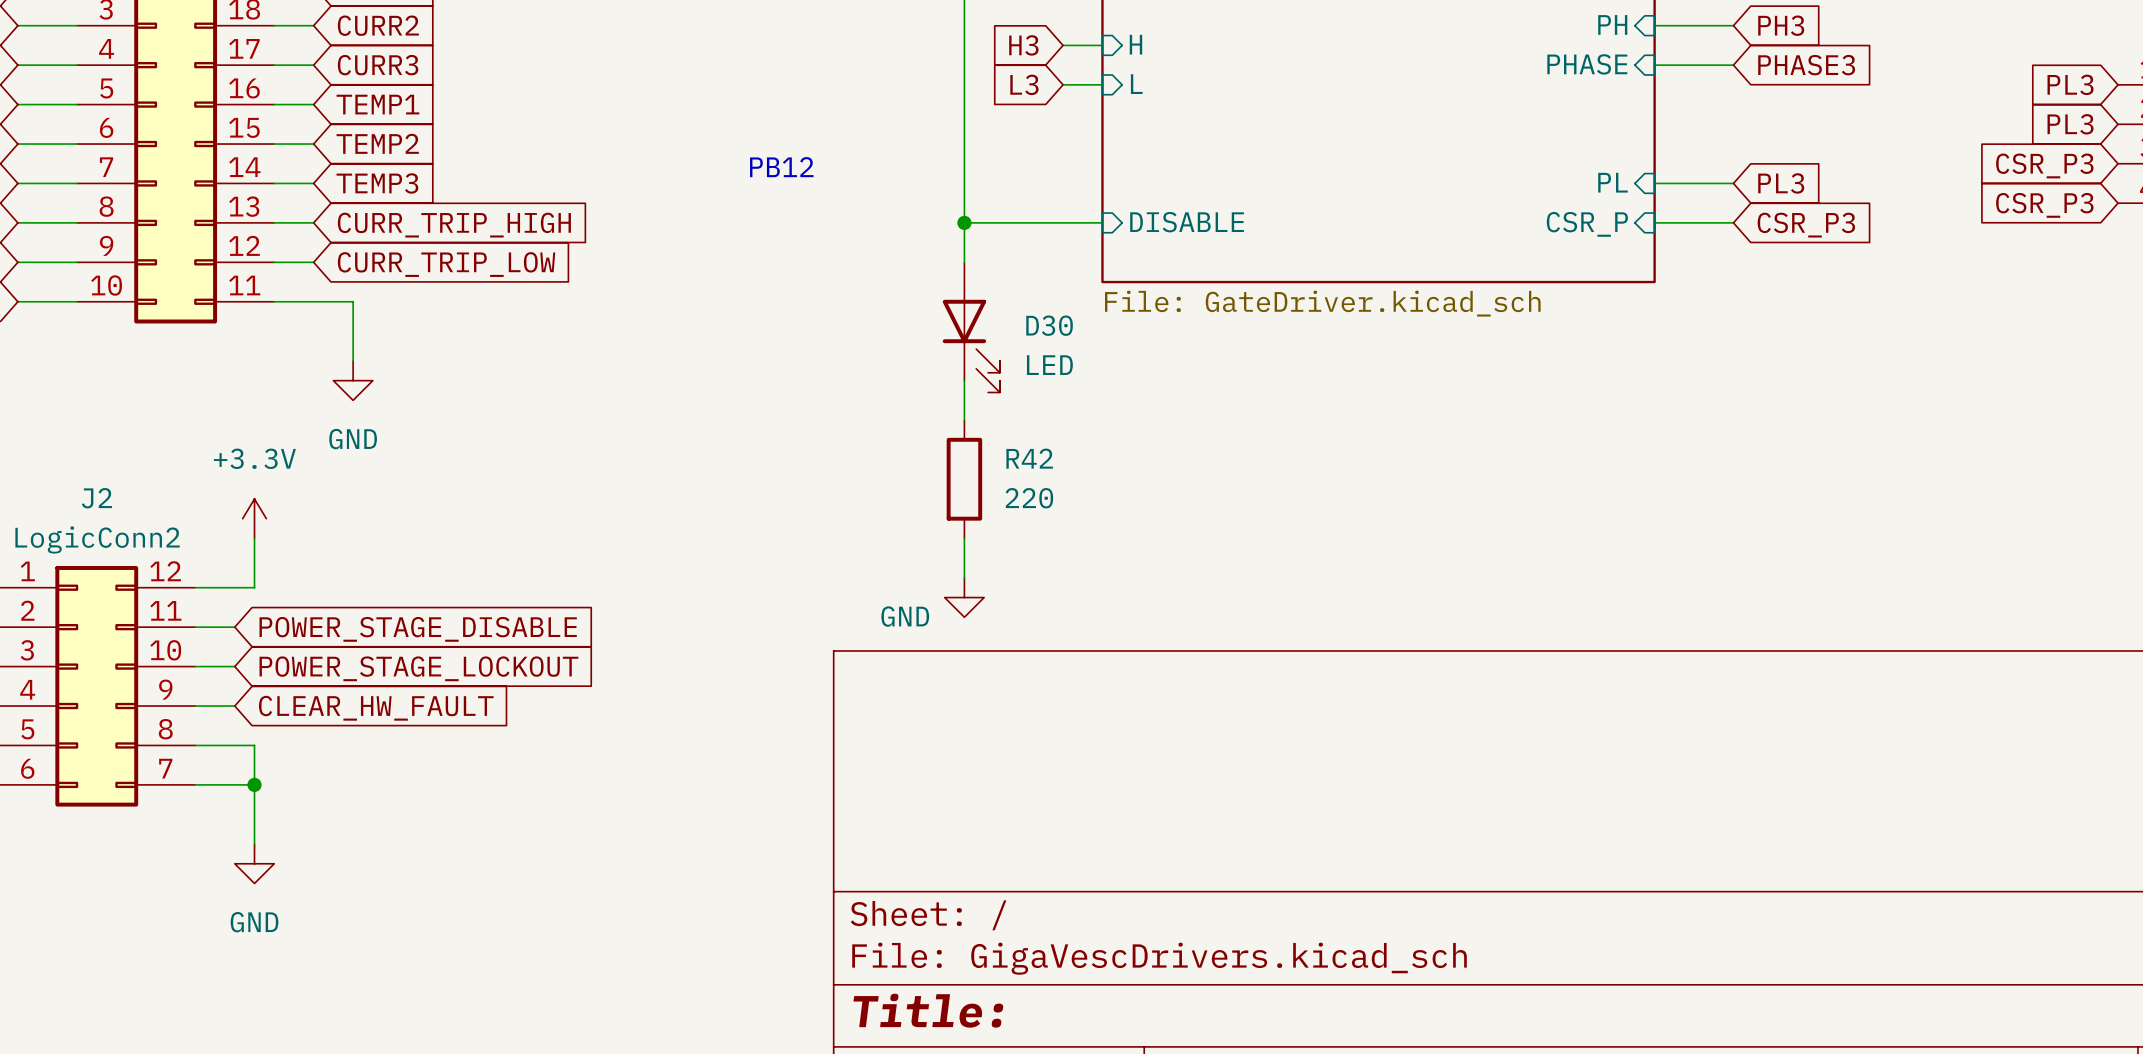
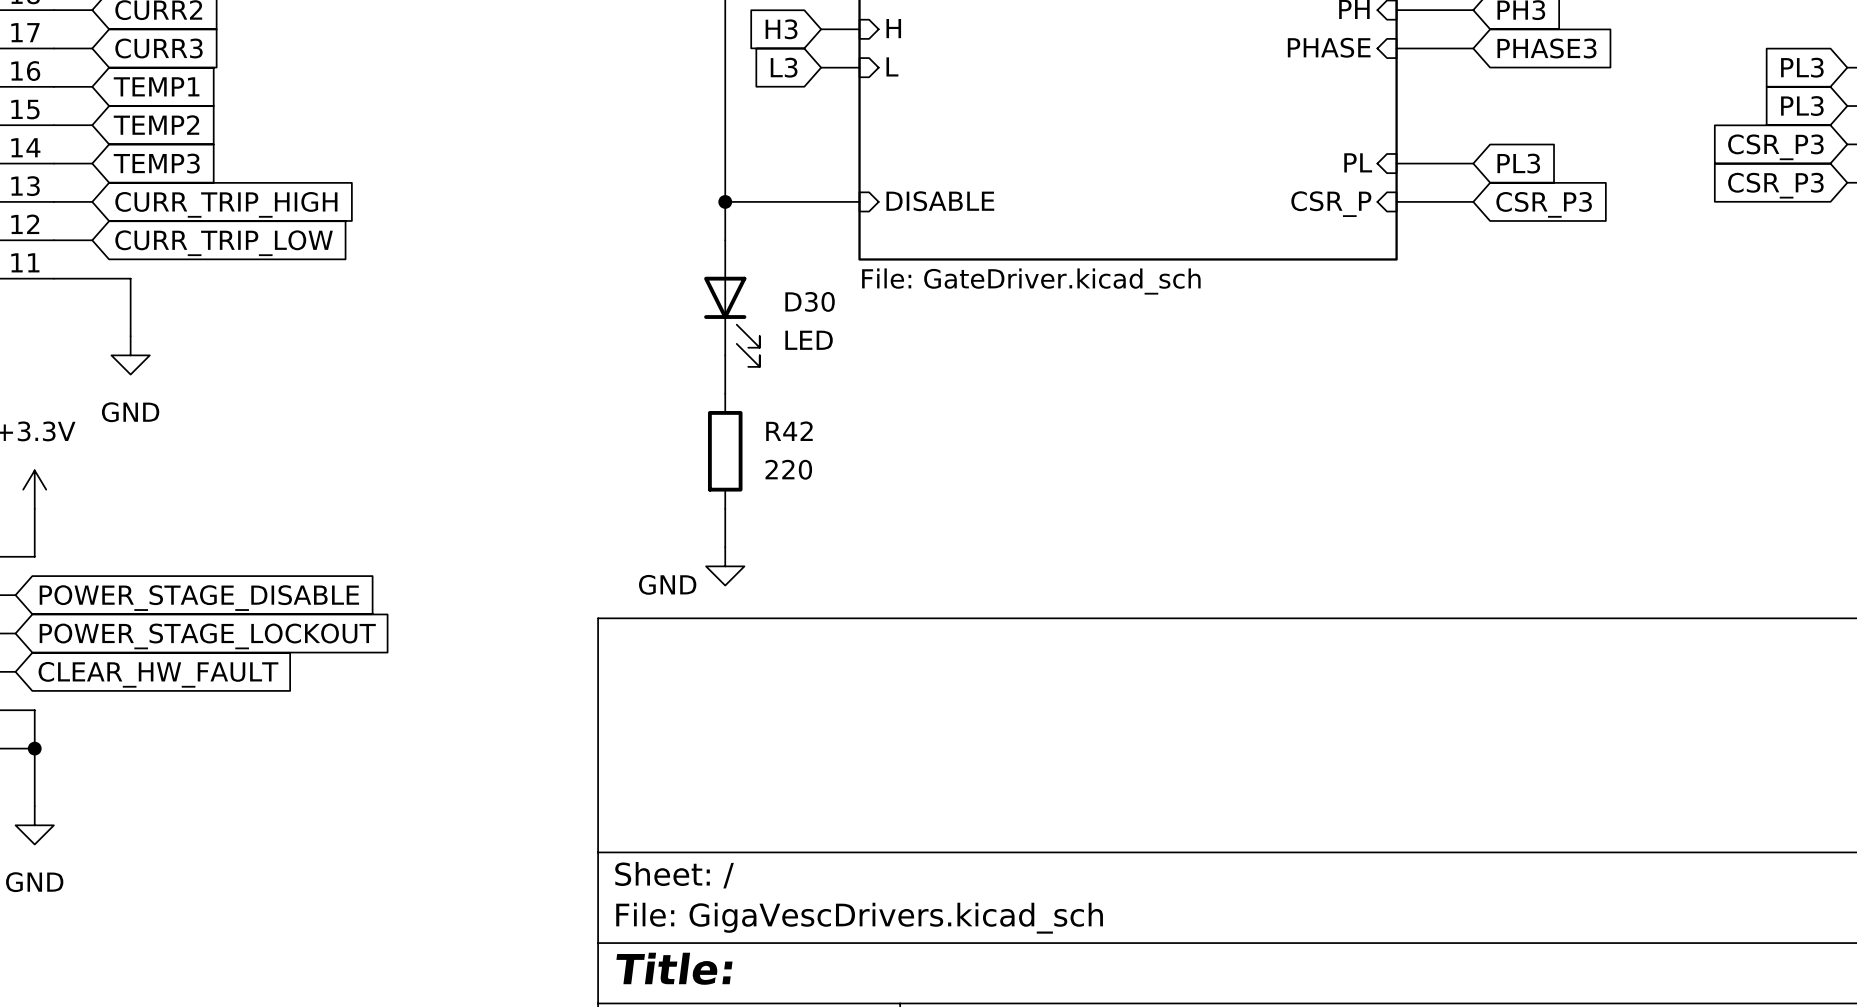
text: PB12 (781, 167) -> none

